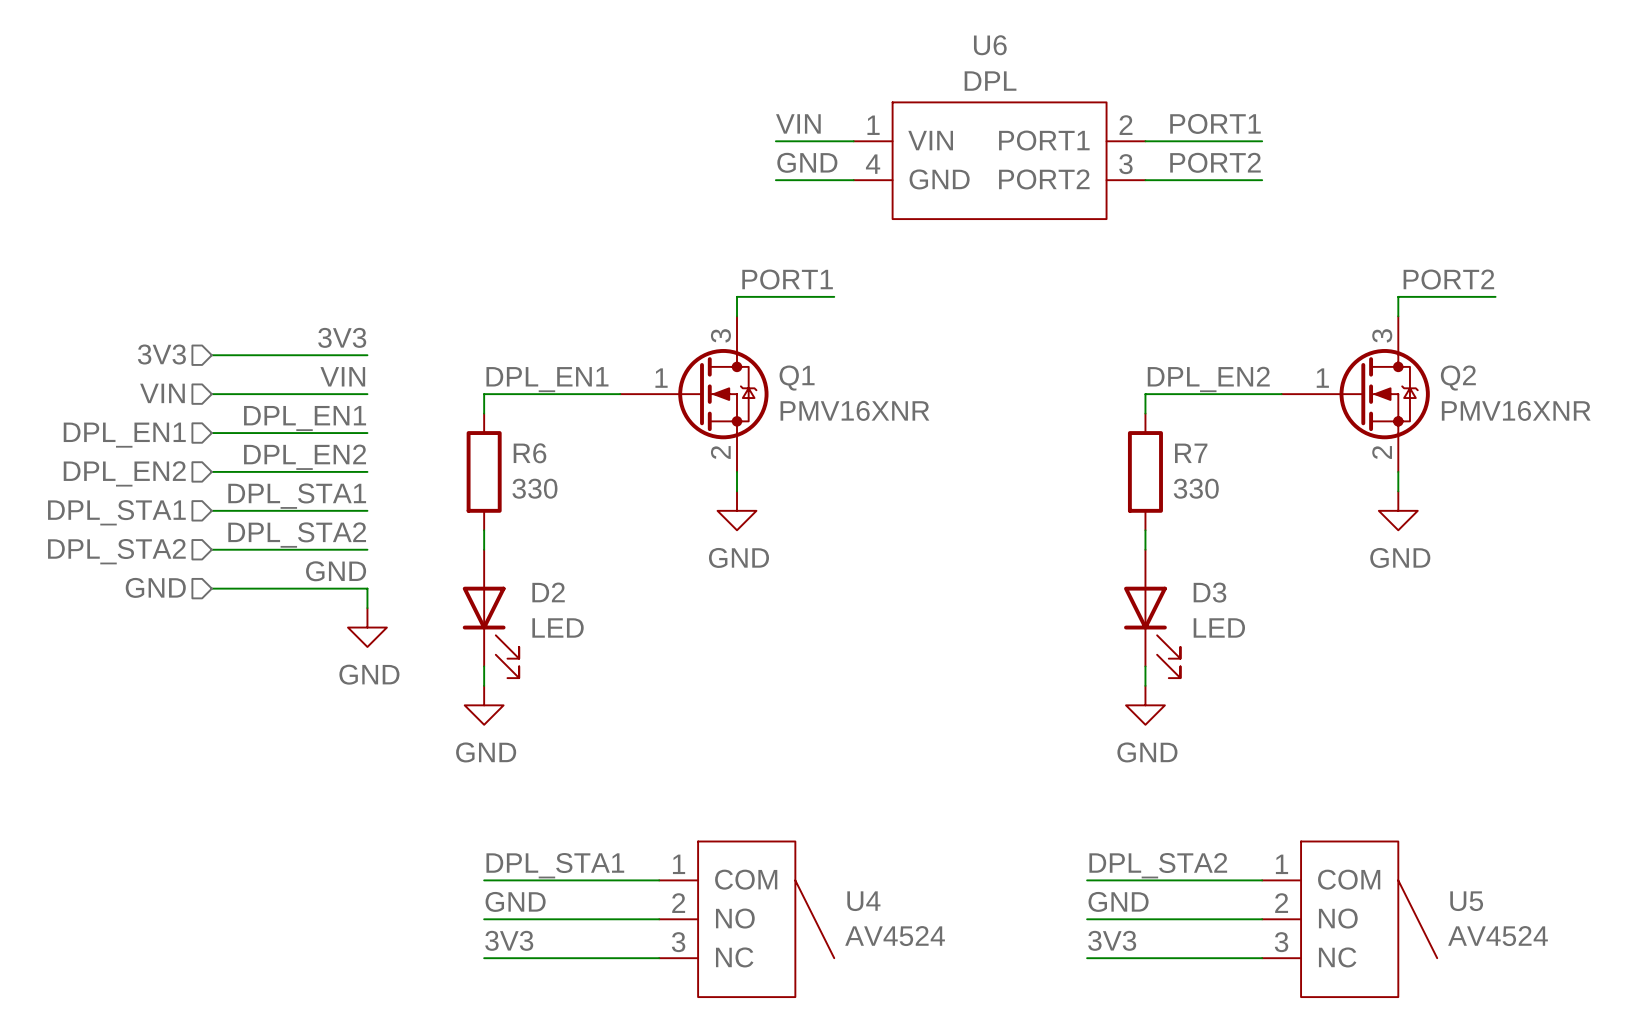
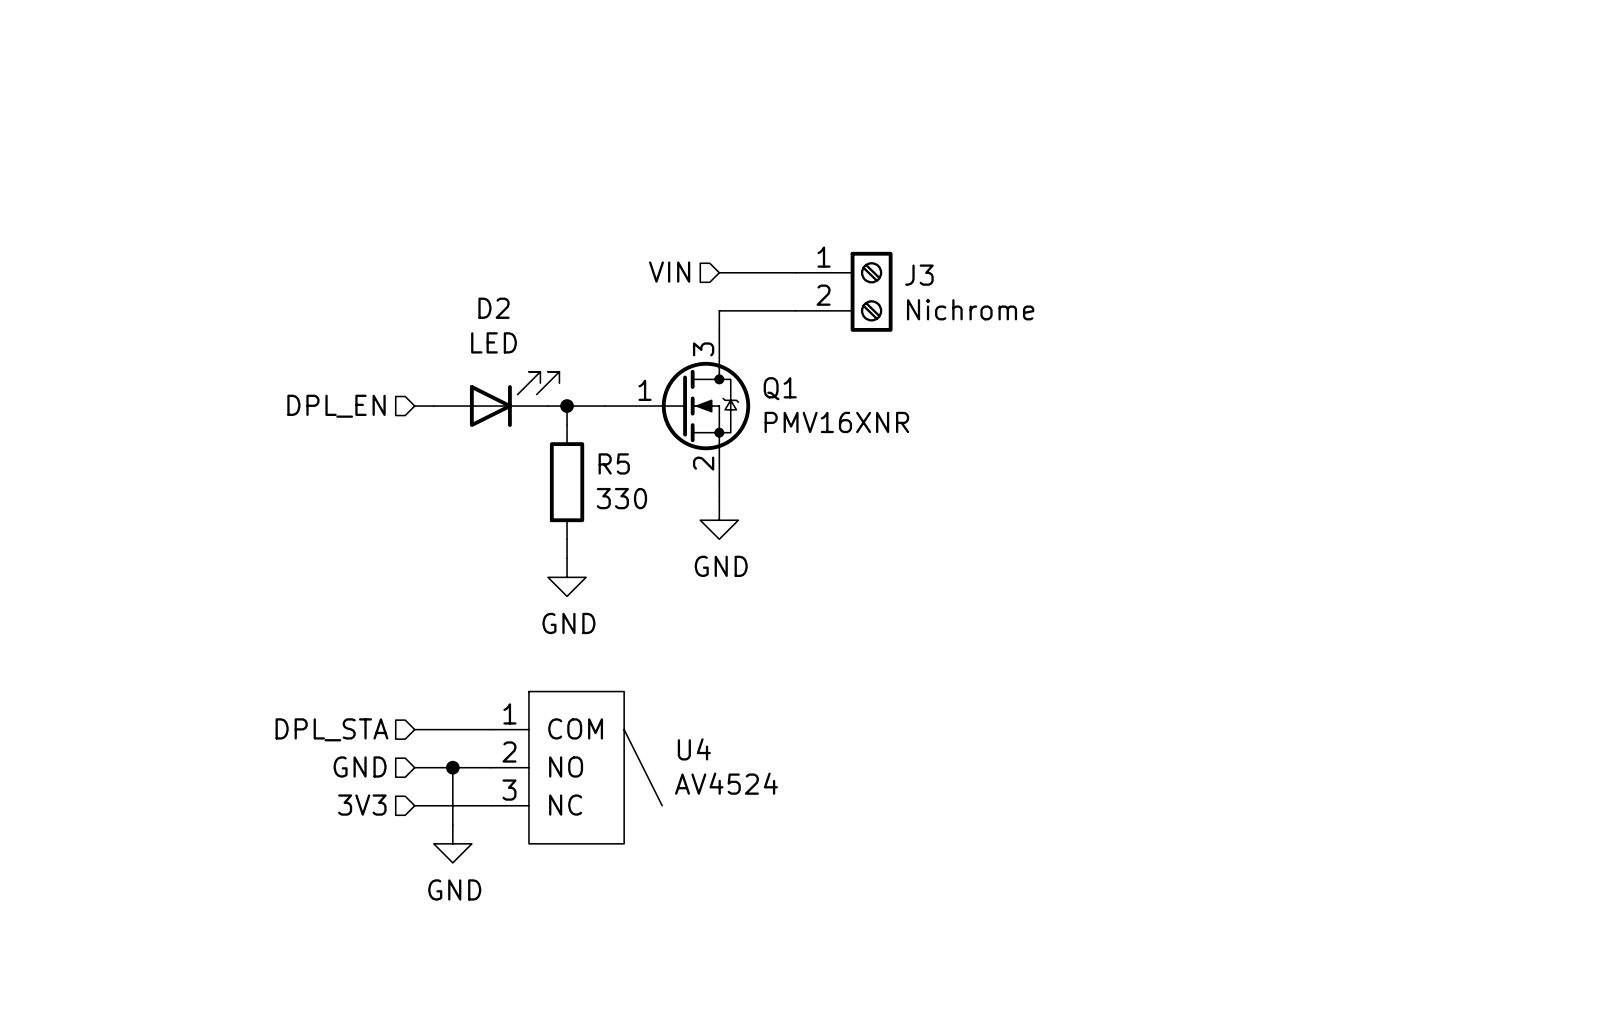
label: VIN (798, 123) -> none
label: PORT1 (1215, 123) -> none
wire: (775, 141) (853, 141) -> none
wire: (1145, 141) (1262, 141) -> none
U6: DPL (999, 160) -> none
label: GND (807, 162) -> none
label: PORT2 (1215, 162) -> none
wire: (775, 180) (853, 180) -> (719, 272) (795, 272)
wire: (1145, 180) (1262, 180) -> none
hierarchical label: none -> VIN (669, 272)
J3: none -> Nichrome (844, 291)
label: PORT1 (787, 279) -> none
label: PORT2 (1448, 279) -> none
wire: (1495, 296) (1398, 296) (1398, 316) -> none
label: 3V3 (342, 337) -> none
hierarchical label: 3V3 (161, 354) -> none
wire: (211, 355) (367, 355) -> none
label: VIN (342, 376) -> none
label: DPL_EN1 (547, 379) -> none
label: DPL_EN2 (1208, 379) -> none
hierarchical label: VIN (162, 393) -> none
wire: (211, 394) (367, 394) -> none
wire: none -> (414, 406) (433, 406)
junction: none -> (567, 406)
wire: (1281, 394) (1145, 394) (1145, 413) -> none
Q2: PMV16XNR (1355, 394) -> none
hierarchical label: none -> DPL_EN (336, 406)
label: DPL_EN1 (305, 418) -> none
wire: (211, 433) (367, 433) -> none
hierarchical label: DPL_EN1 (124, 435) -> none
label: DPL_EN2 (305, 457) -> none
wire: (211, 471) (367, 471) -> none
R6: 330 (484, 471) -> none
R5: none -> 330 (567, 482)
R7: 330 (1145, 471) -> none
wire: (1398, 471) (1398, 491) -> none
hierarchical label: DPL_EN2 (124, 473) -> none
label: DPL_STA1 (297, 496) -> none
wire: (211, 510) (367, 510) -> none
power symbol: GND (1398, 510) -> none
hierarchical label: DPL_STA1 (116, 512) -> none
wire: (484, 530) (484, 549) -> (567, 406) (567, 425)
wire: (1145, 530) (1145, 549) -> none
label: DPL_STA2 (297, 535) -> none
wire: (211, 549) (367, 549) -> none
hierarchical label: DPL_STA2 (116, 551) -> none
power symbol: none -> GND (567, 577)
label: GND (336, 571) -> none
hierarchical label position: GND (155, 587) -> GND (360, 766)
wire: (211, 588) (367, 588) (367, 608) -> none
D2 name position: D2 (548, 592) -> D2 (494, 308)
D2 position: (490, 613) -> (496, 399)
D3: LED (1152, 613) -> none
power symbol: GND (367, 627) -> none
D2 rotation: 0° (490, 632) -> 90° counterclockwise (514, 399)
wire: (484, 666) (484, 685) -> (567, 539) (567, 558)
wire: (1145, 666) (1145, 685) -> none
power symbol: GND (484, 705) -> none
power symbol: GND (1145, 705) -> none
wire: none -> (414, 729) (490, 729)
hierarchical label: none -> DPL_STA (331, 729)
wire: none -> (414, 767) (490, 767)
wire: none -> (452, 767) (452, 824)
junction: none -> (452, 767)
hierarchical label: none -> 3V3 (362, 805)
wire: none -> (414, 805) (490, 805)
power symbol: none -> GND (452, 843)
label: DPL_STA1 (555, 865) -> none
label: DPL_STA2 (1158, 865) -> none
wire: (484, 880) (659, 880) -> none
wire: (1087, 880) (1262, 880) -> none
label: GND (515, 901) -> none
label: GND (1118, 901) -> none
wire: (484, 919) (659, 919) -> none
U4 position: (746, 919) -> (576, 767)
wire: (1087, 919) (1262, 919) -> none
U5: AV4524 (1349, 919) -> none
label: 3V3 (509, 940) -> none
label: 3V3 (1112, 940) -> none
wire: (484, 958) (659, 958) -> none
wire: (1087, 958) (1262, 958) -> none

